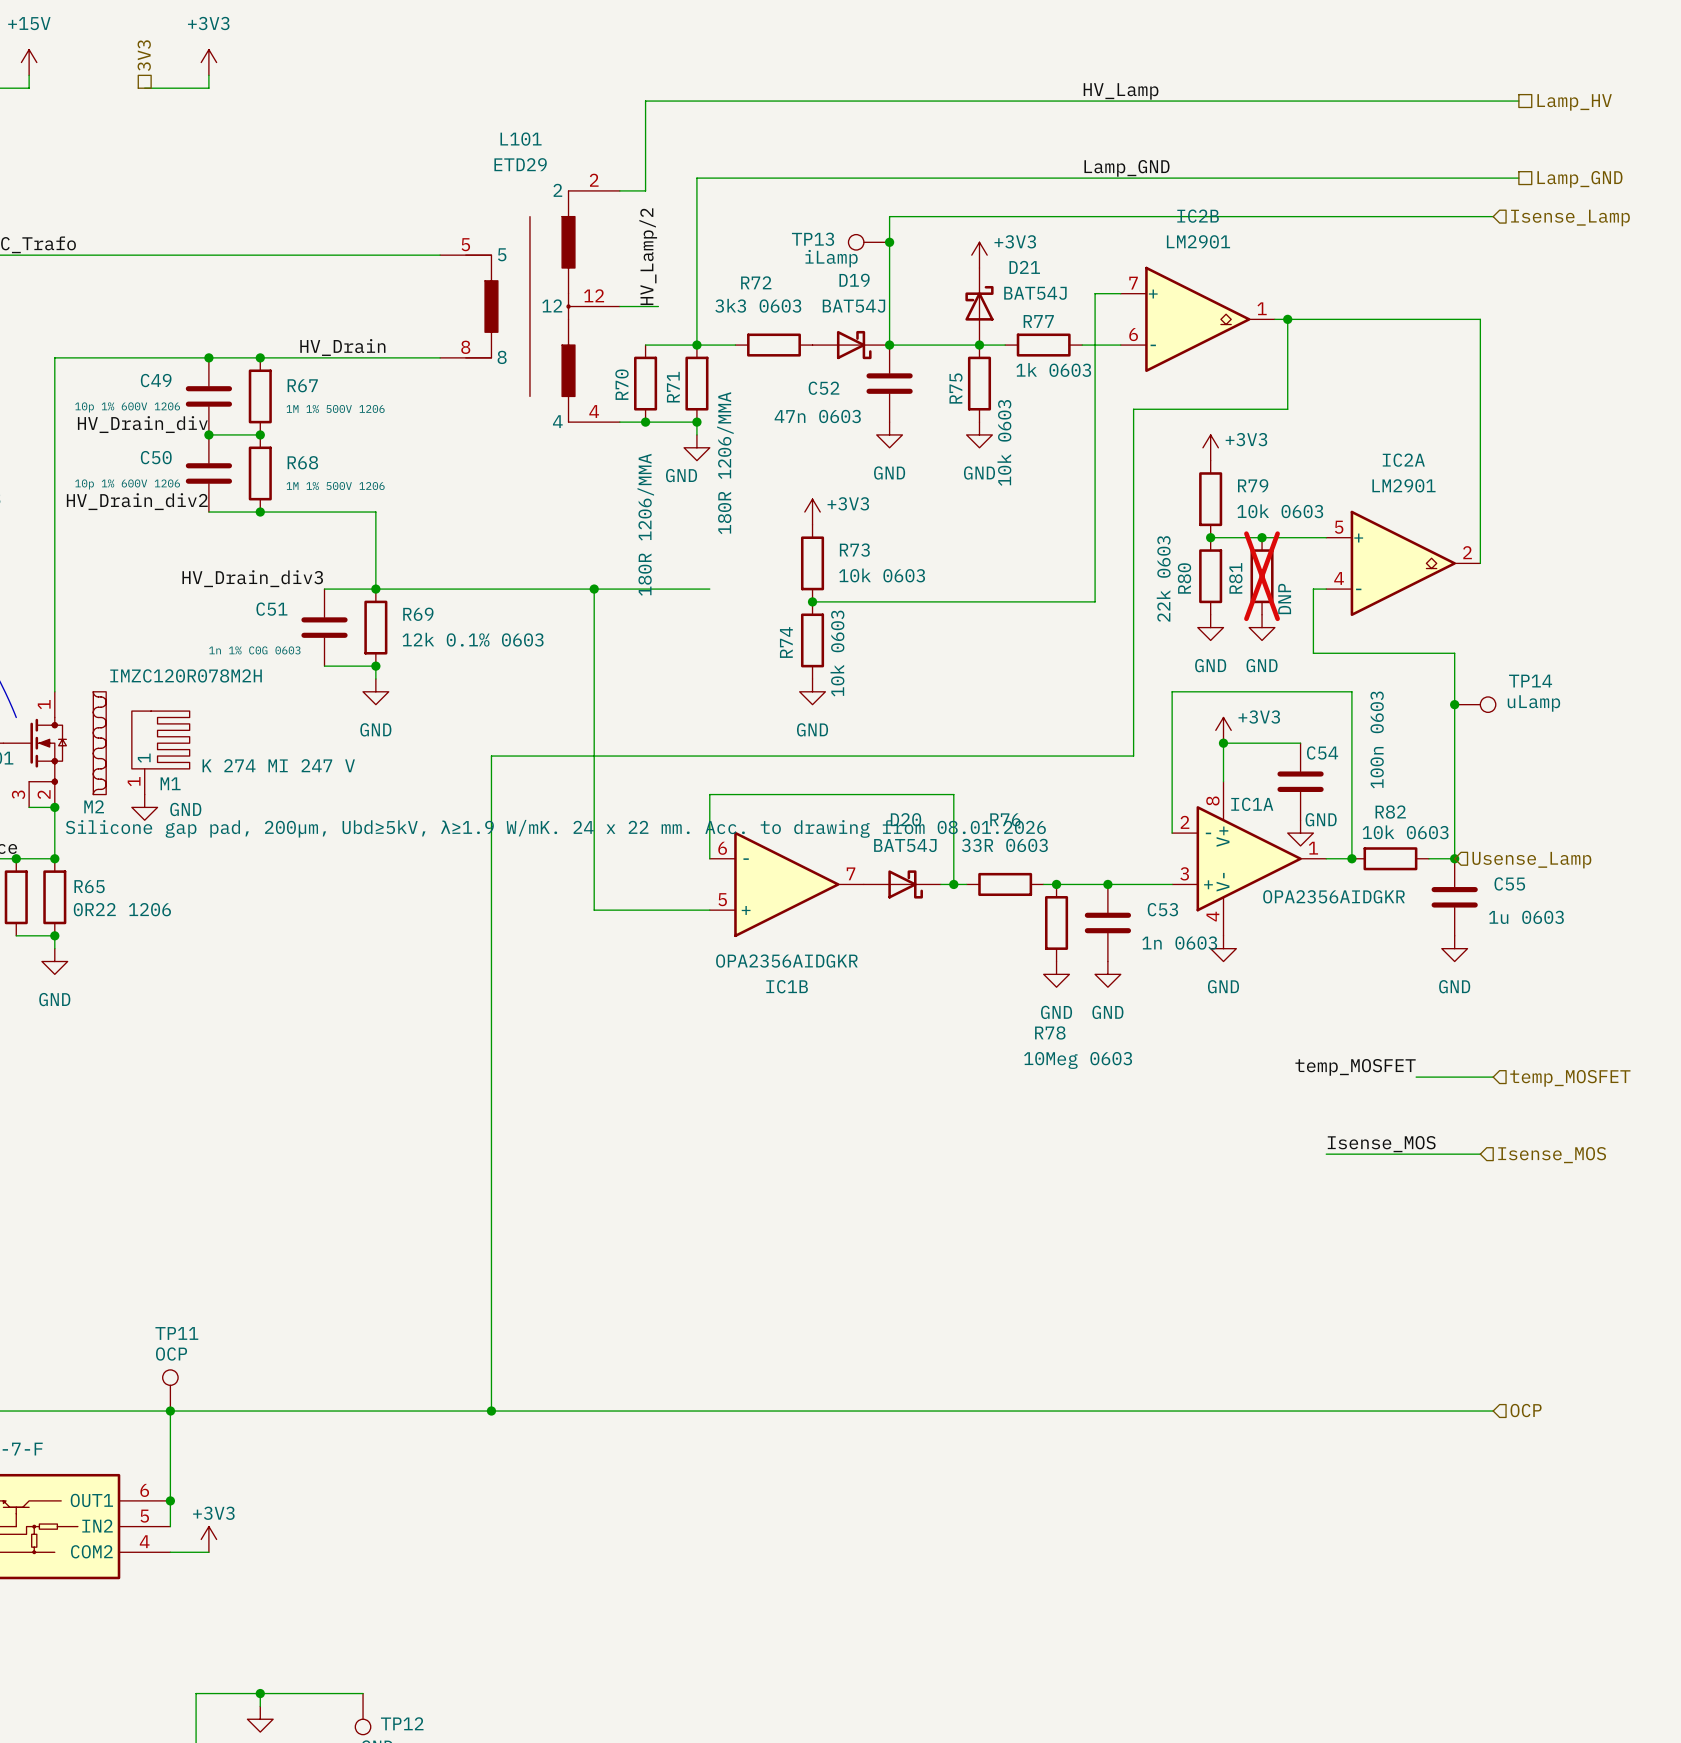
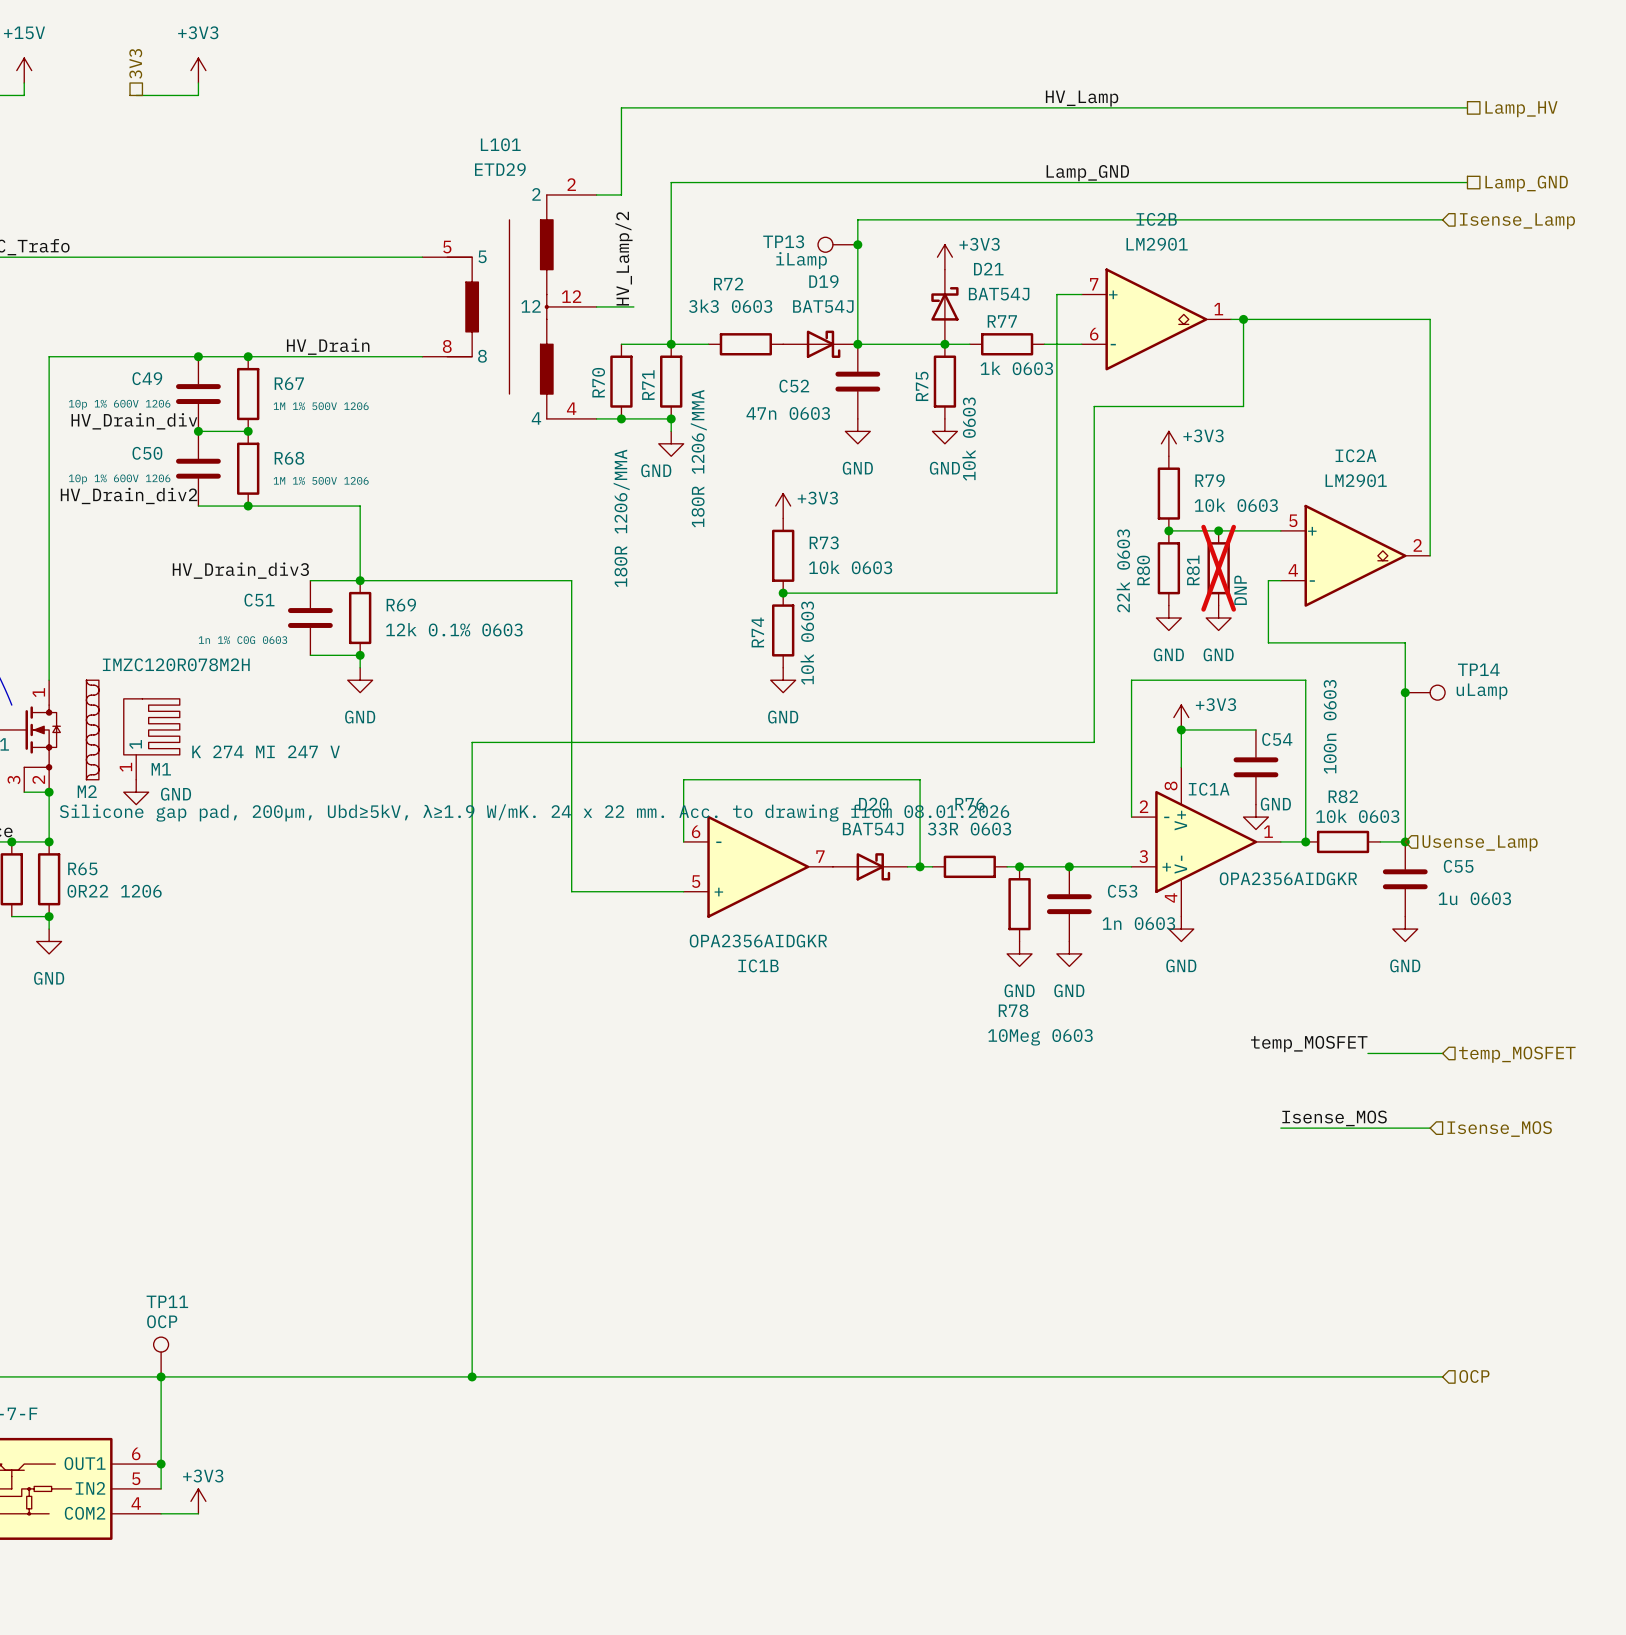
wire: (594, 589) (709, 589) -> none
junction: (594, 589) -> none

